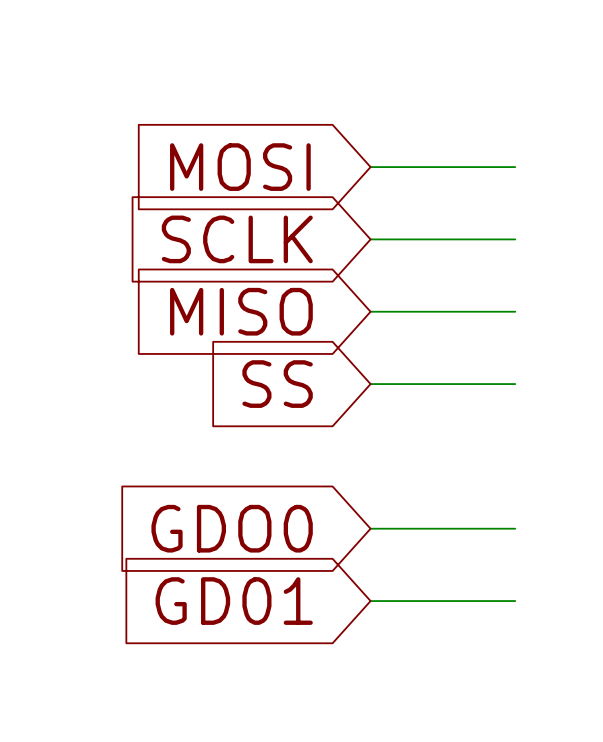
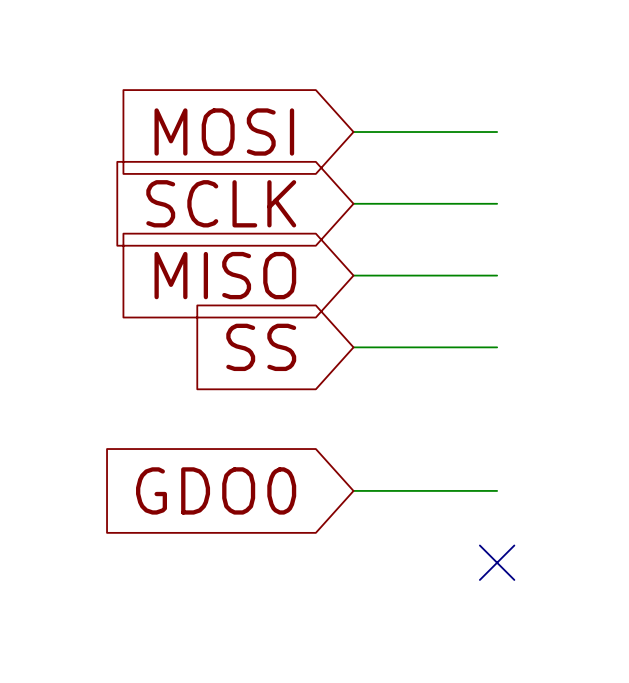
global label: GD01 (234, 601) -> none
wire: (370, 601) (515, 601) -> none
no-connect mark: none -> (497, 562)

